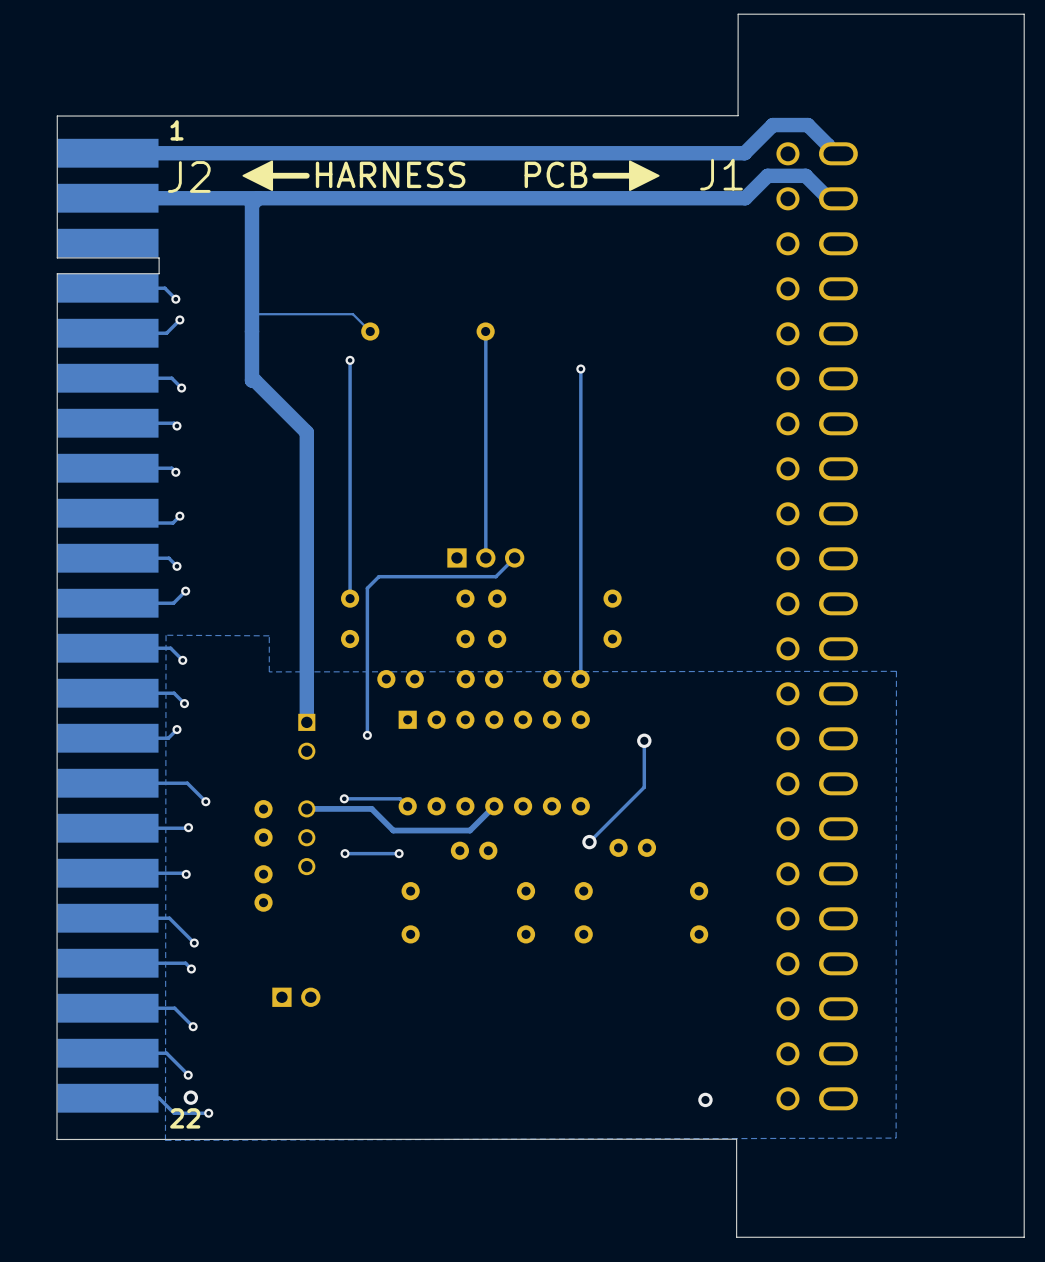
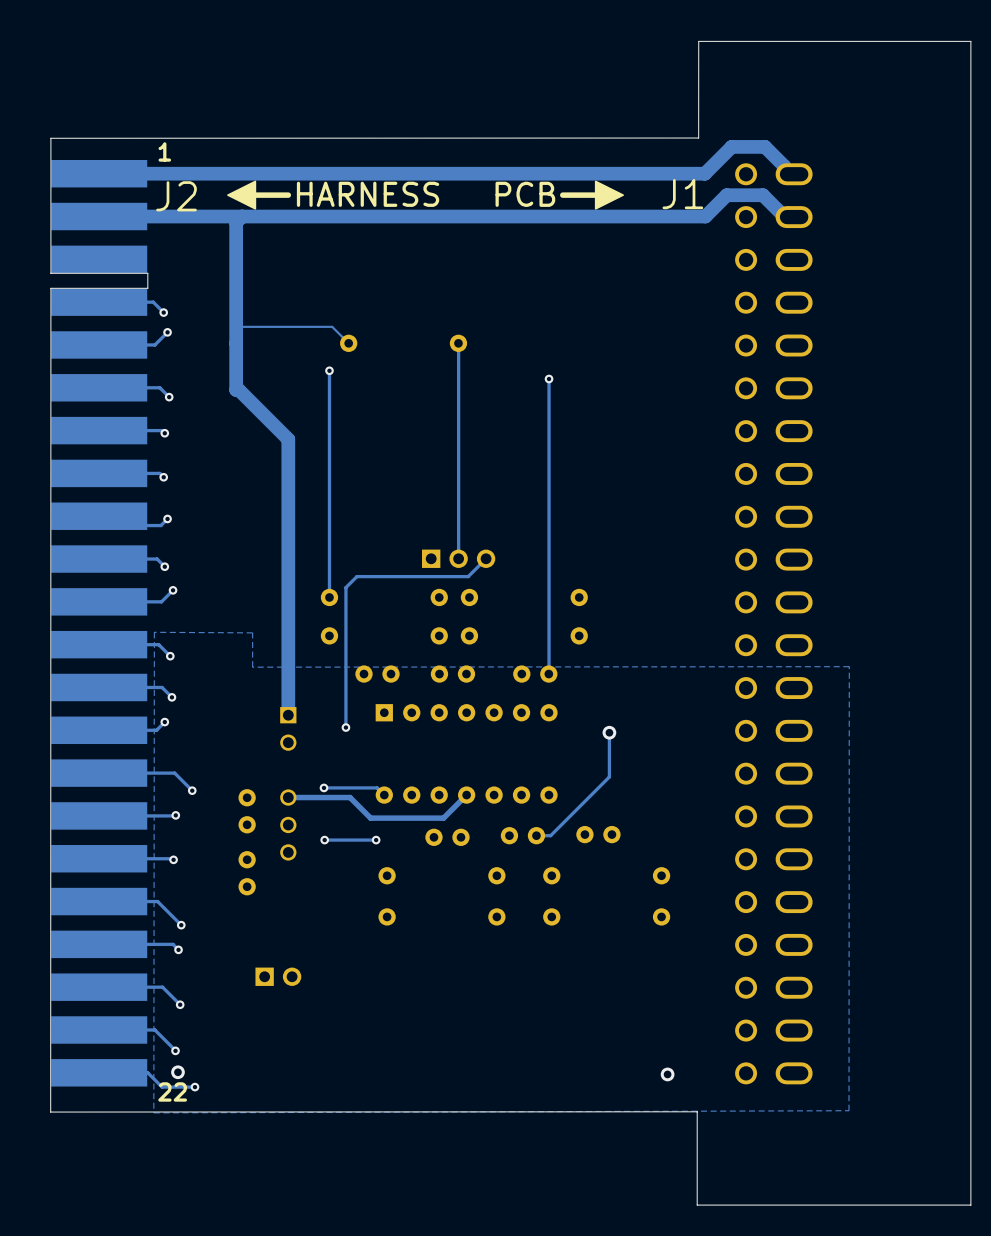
track: none -> (557, 829) (550, 835) (536, 835)
via: (589, 842) -> none
part: none -> (522, 835)

